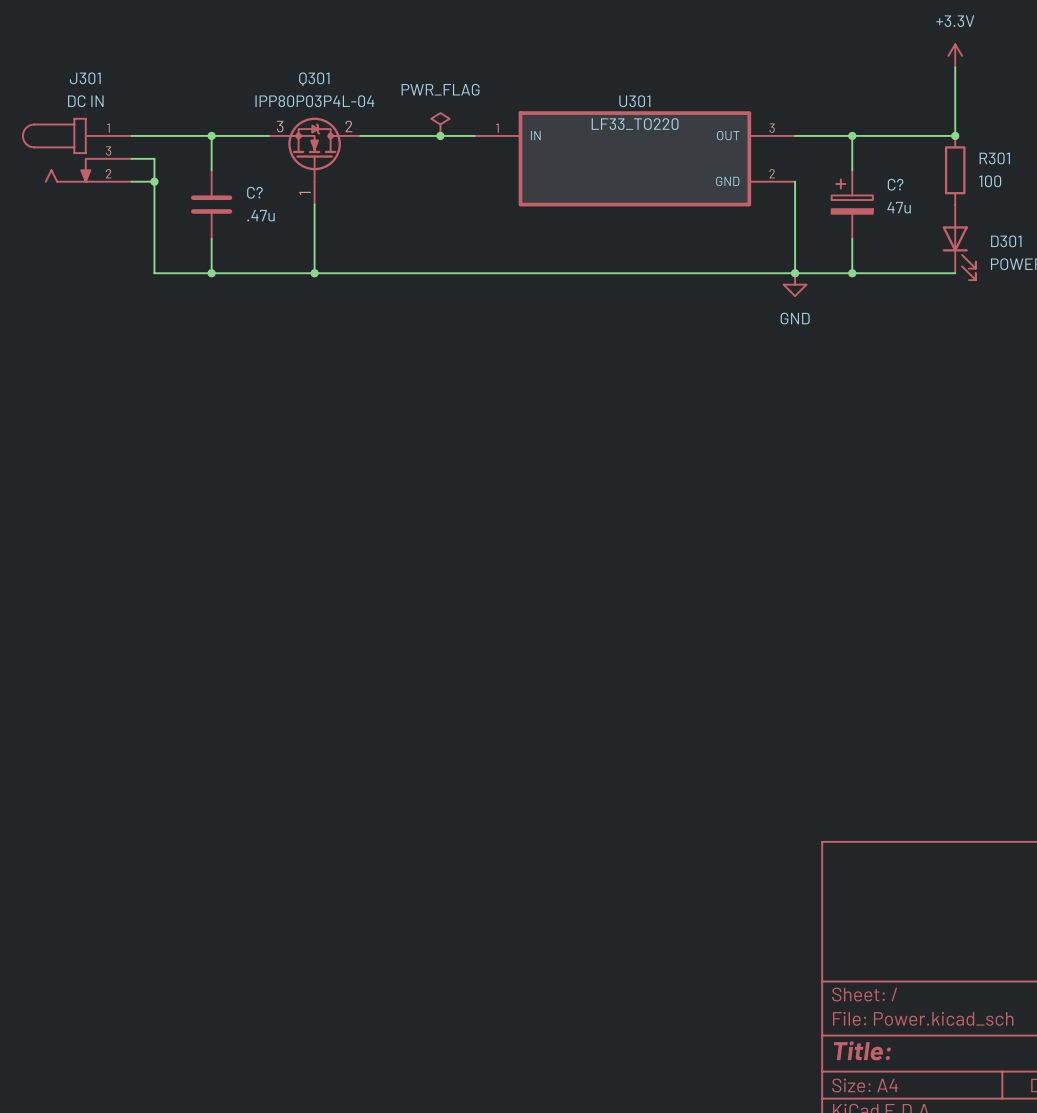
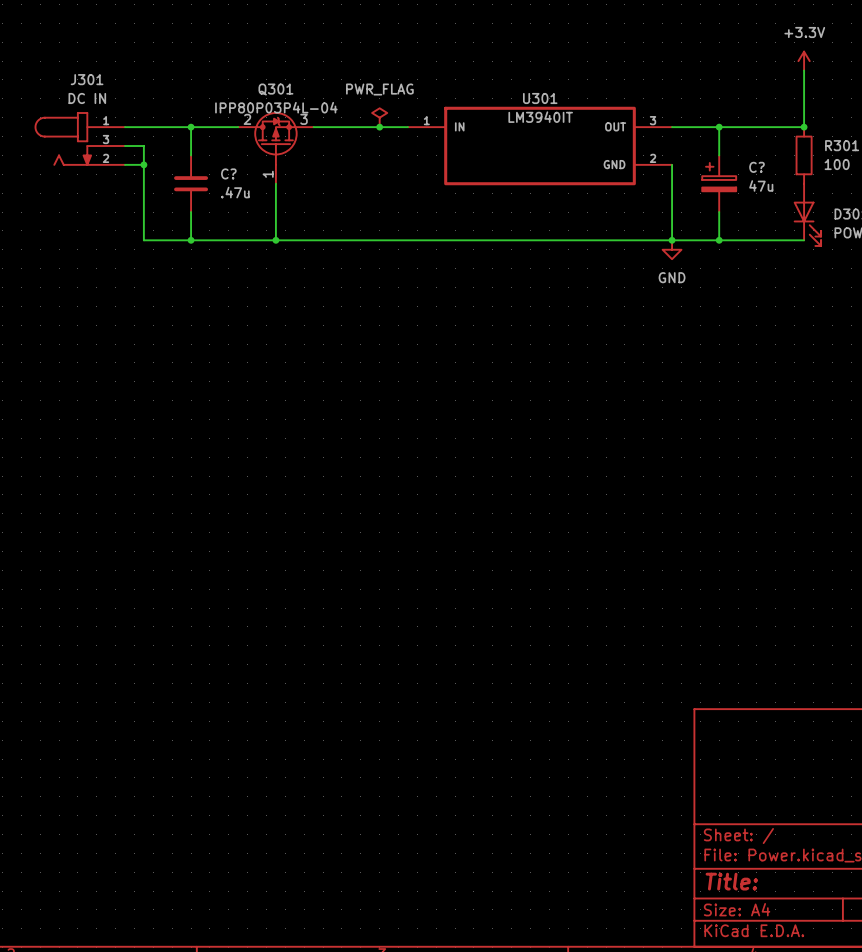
Q301 symbol: [268, 117, 361, 205] -> [238, 112, 314, 184]
U301 value: LF33_TO220 (635, 124) -> LM3940IT (540, 117)

